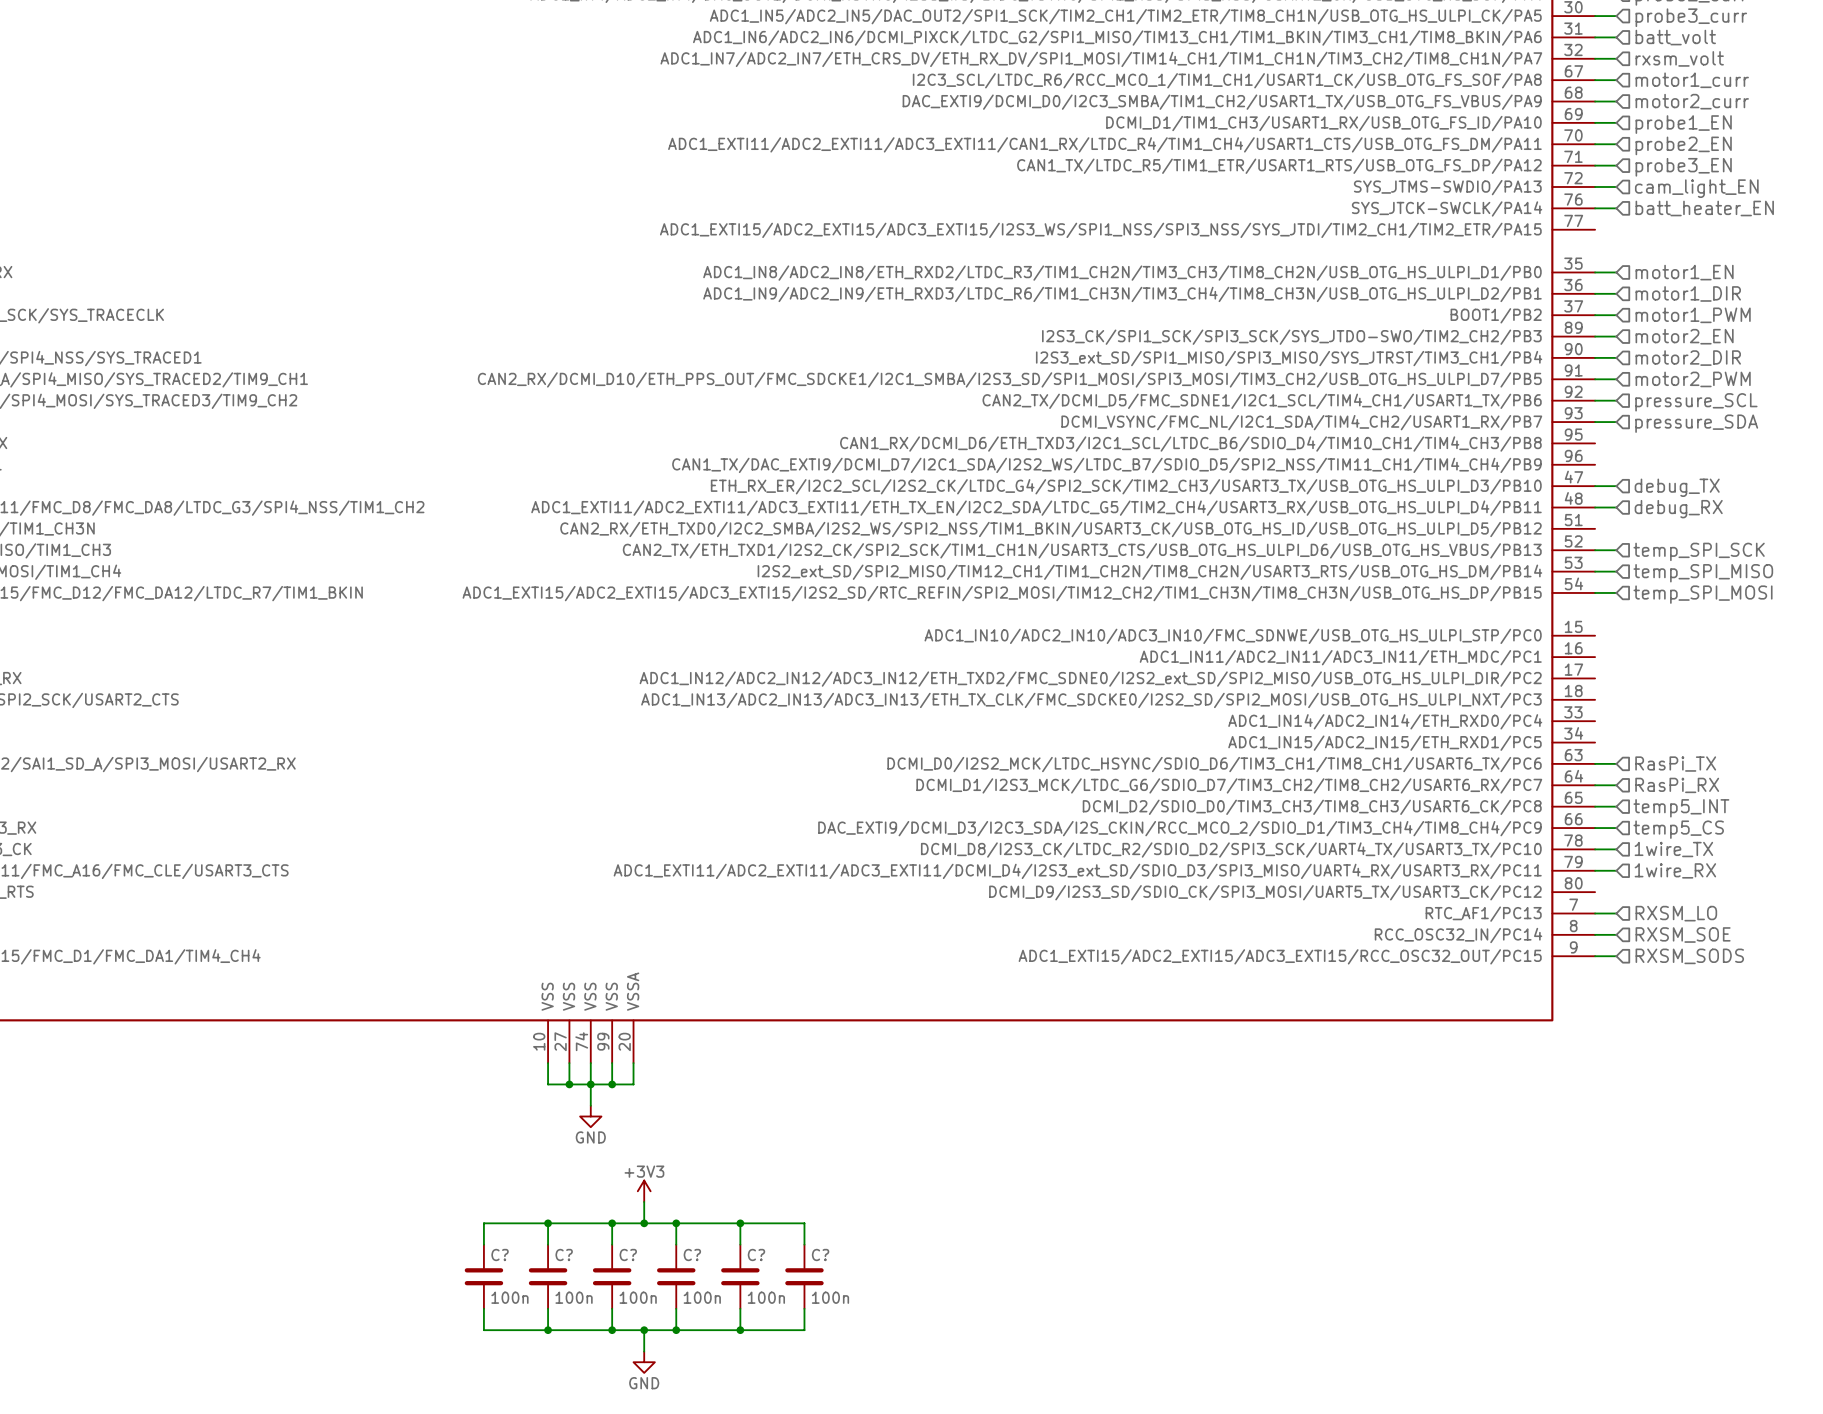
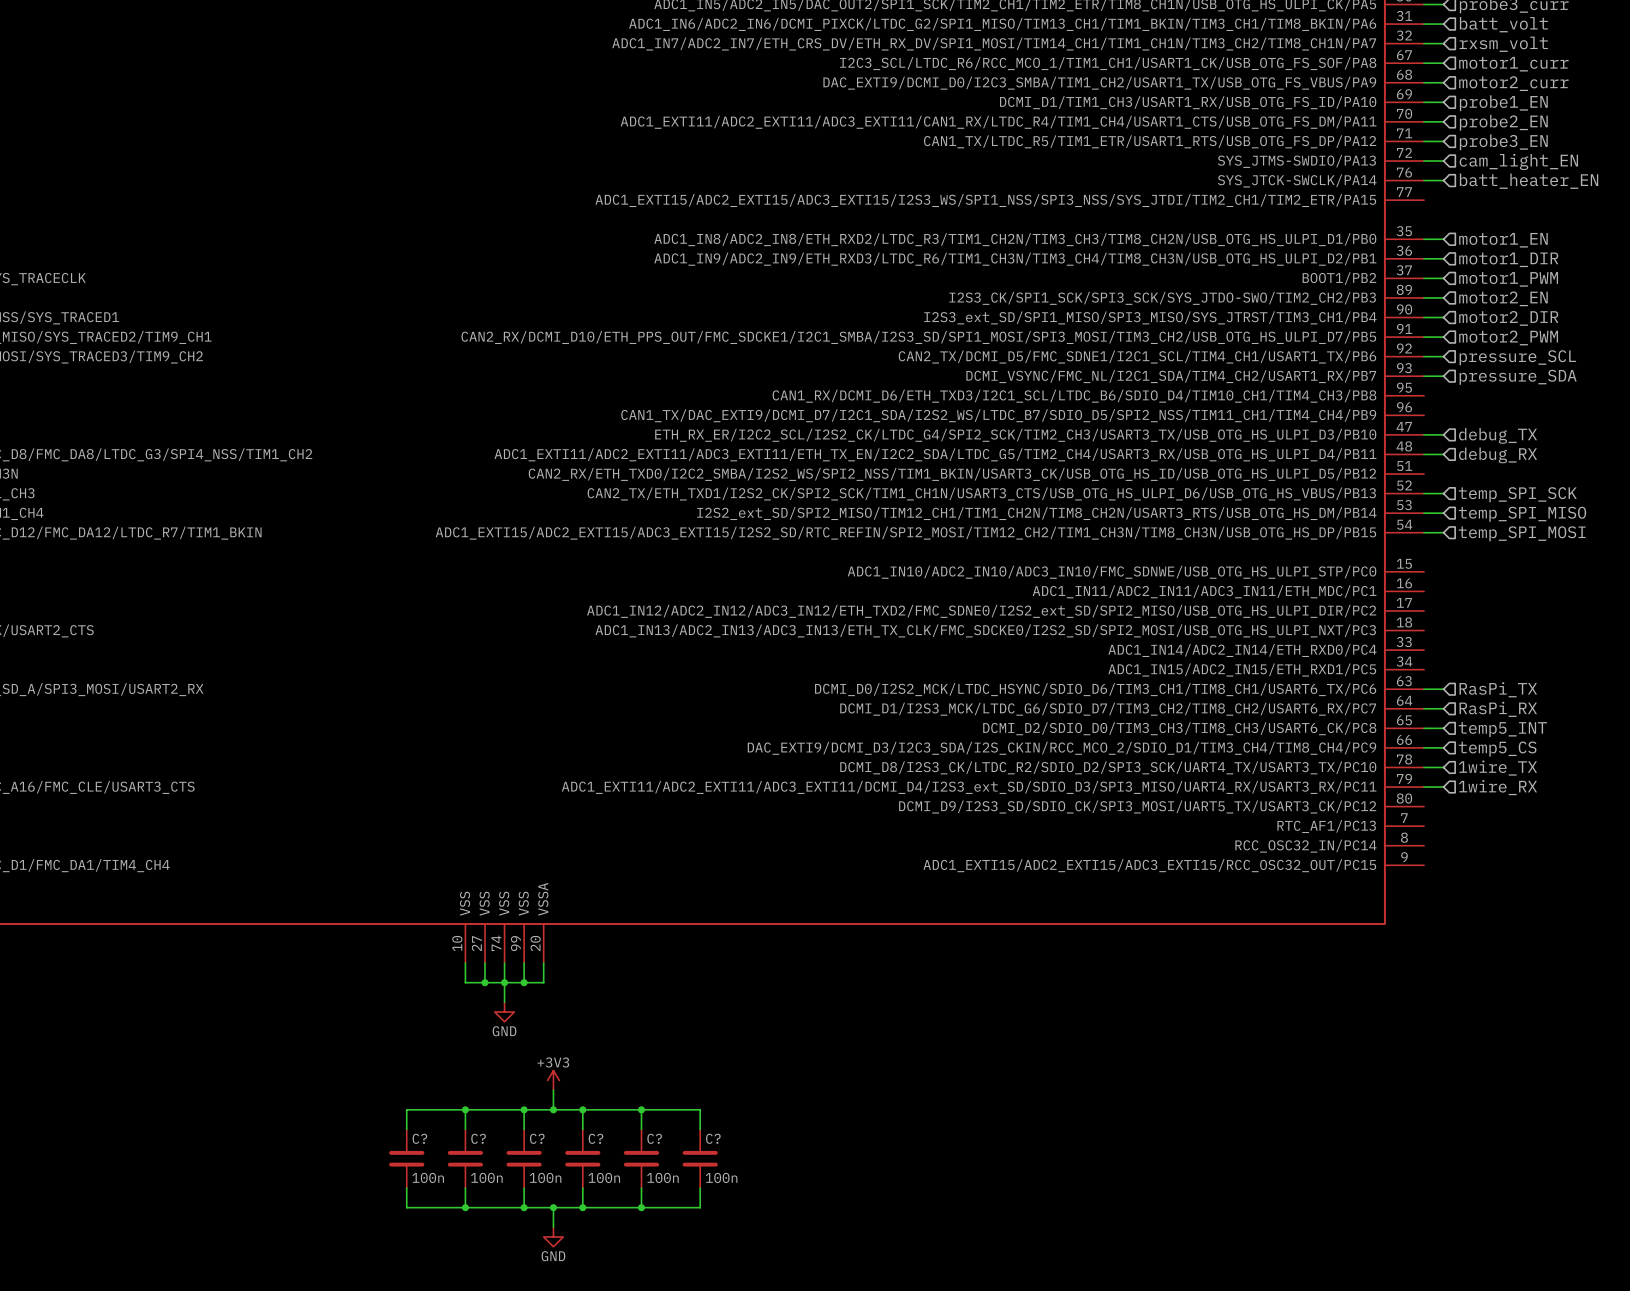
wire: (1595, 913) (1616, 913) -> none
hierarchical label: RXSM_LO (1676, 913) -> none
wire: (1595, 934) (1616, 934) -> none
hierarchical label: RXSM_SOE (1683, 935) -> none
wire: (1595, 956) (1616, 956) -> none
hierarchical label: RXSM_SODS (1689, 956) -> none

